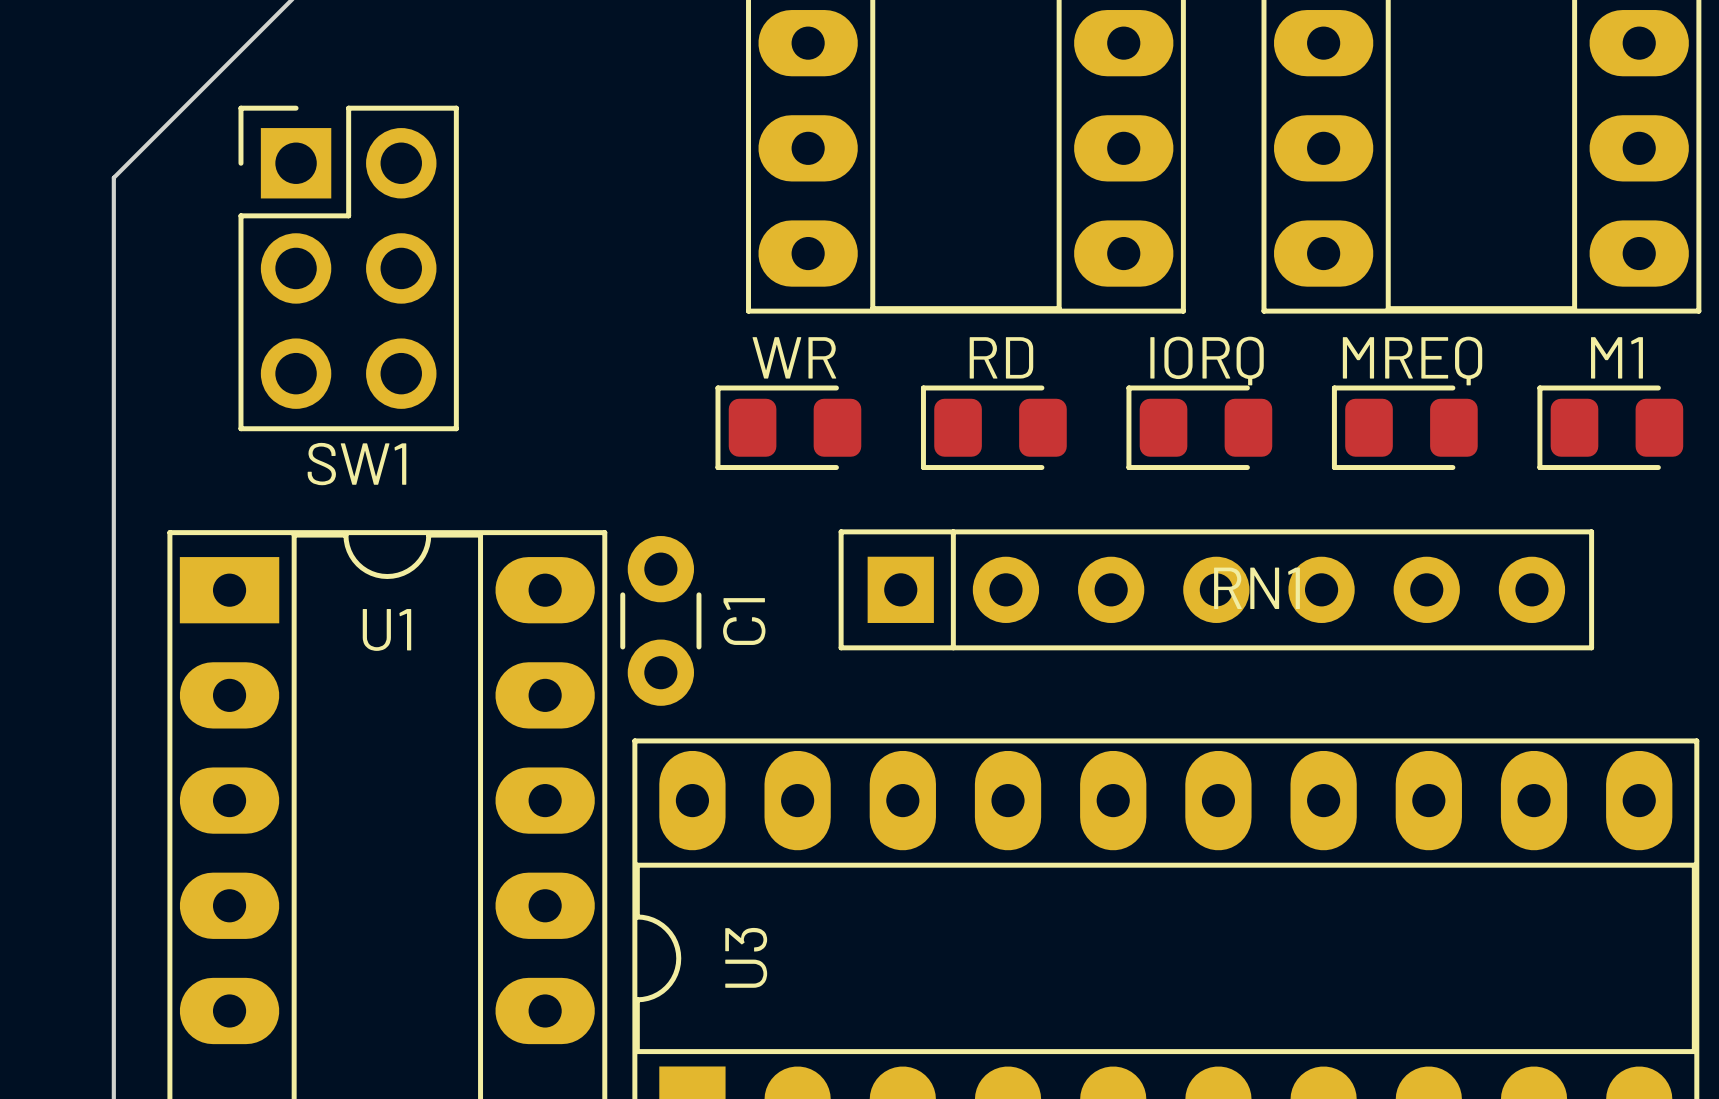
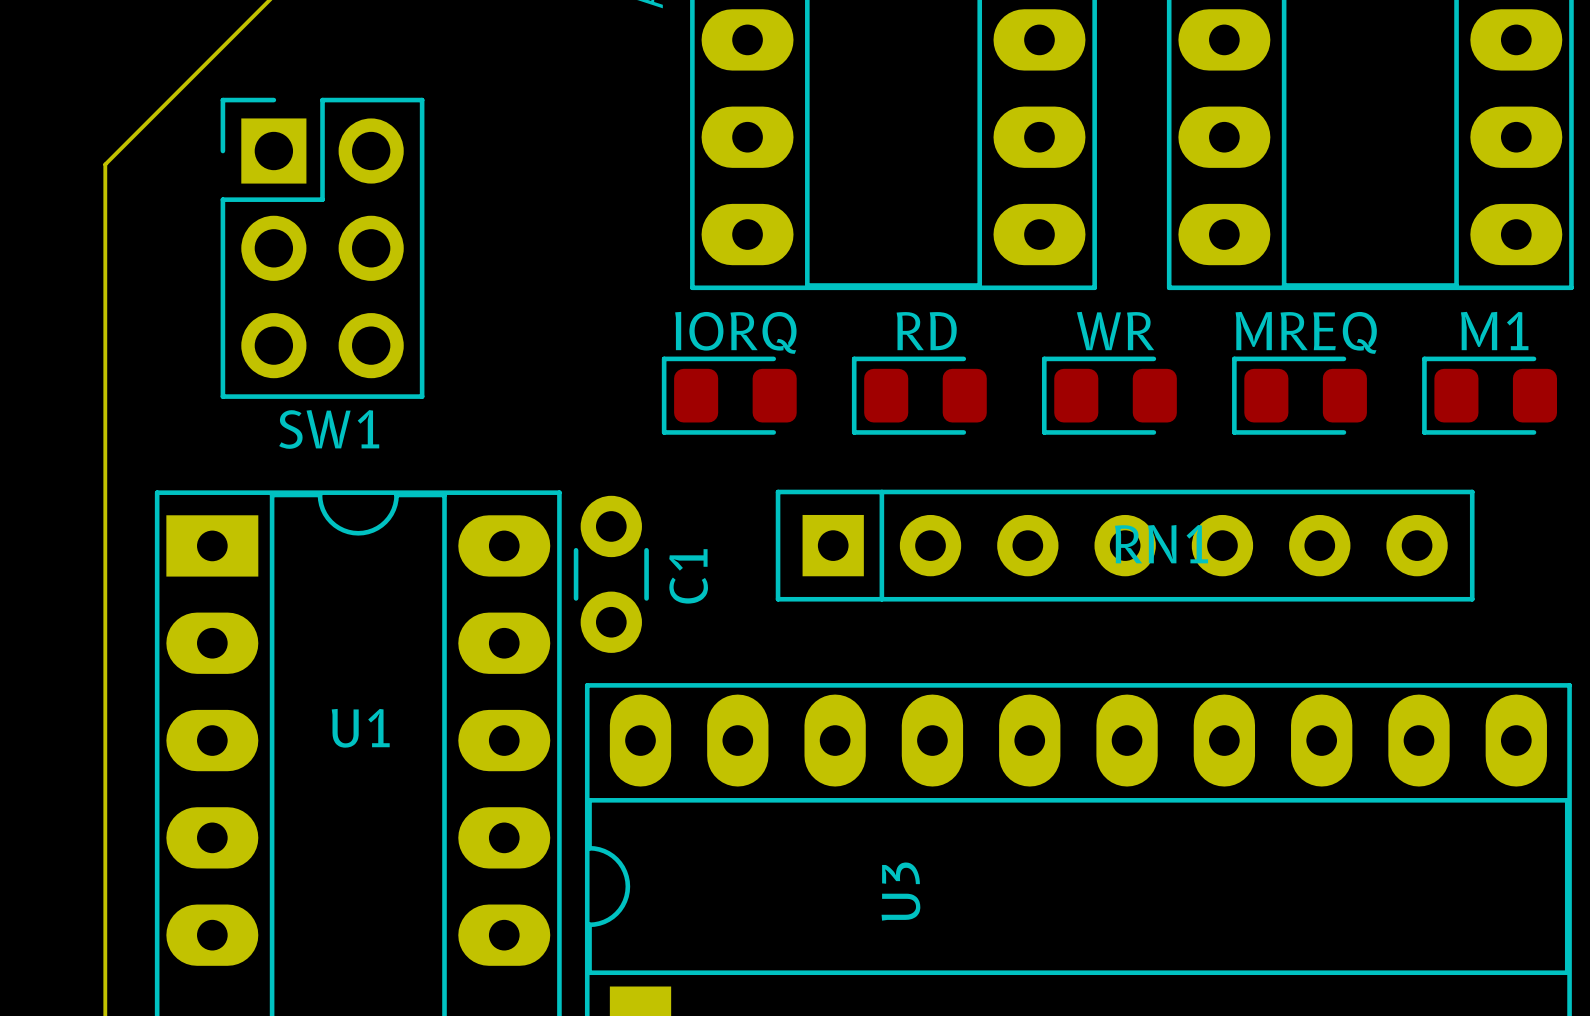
WR name: WR (794, 357) -> IORQ (735, 332)
IORQ name: IORQ (1207, 361) -> WR (1115, 331)
U1 name position: U1 (386, 629) -> U1 (360, 728)
U3 name position: U3 (746, 957) -> U3 (900, 891)

